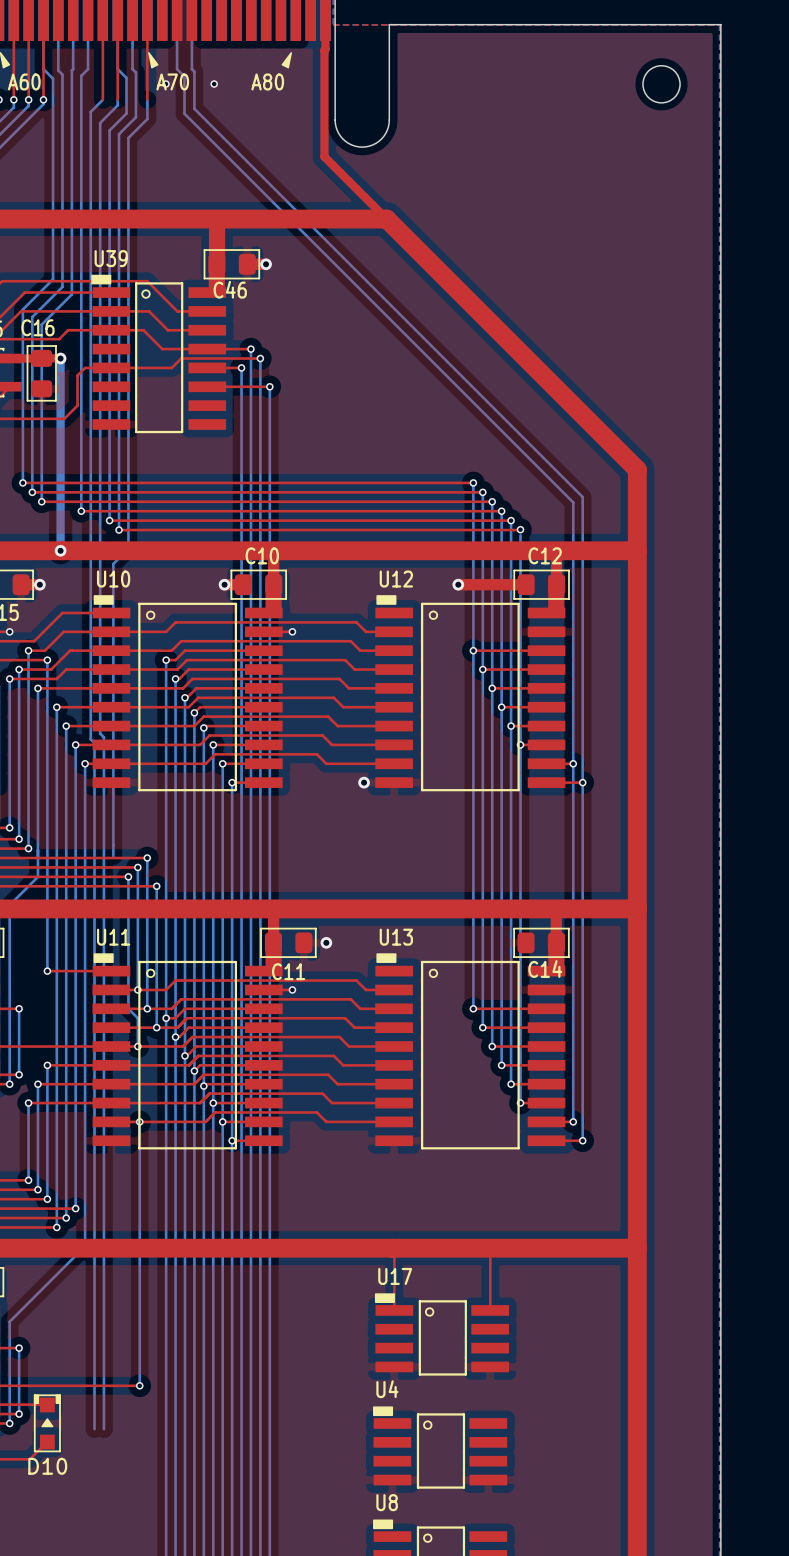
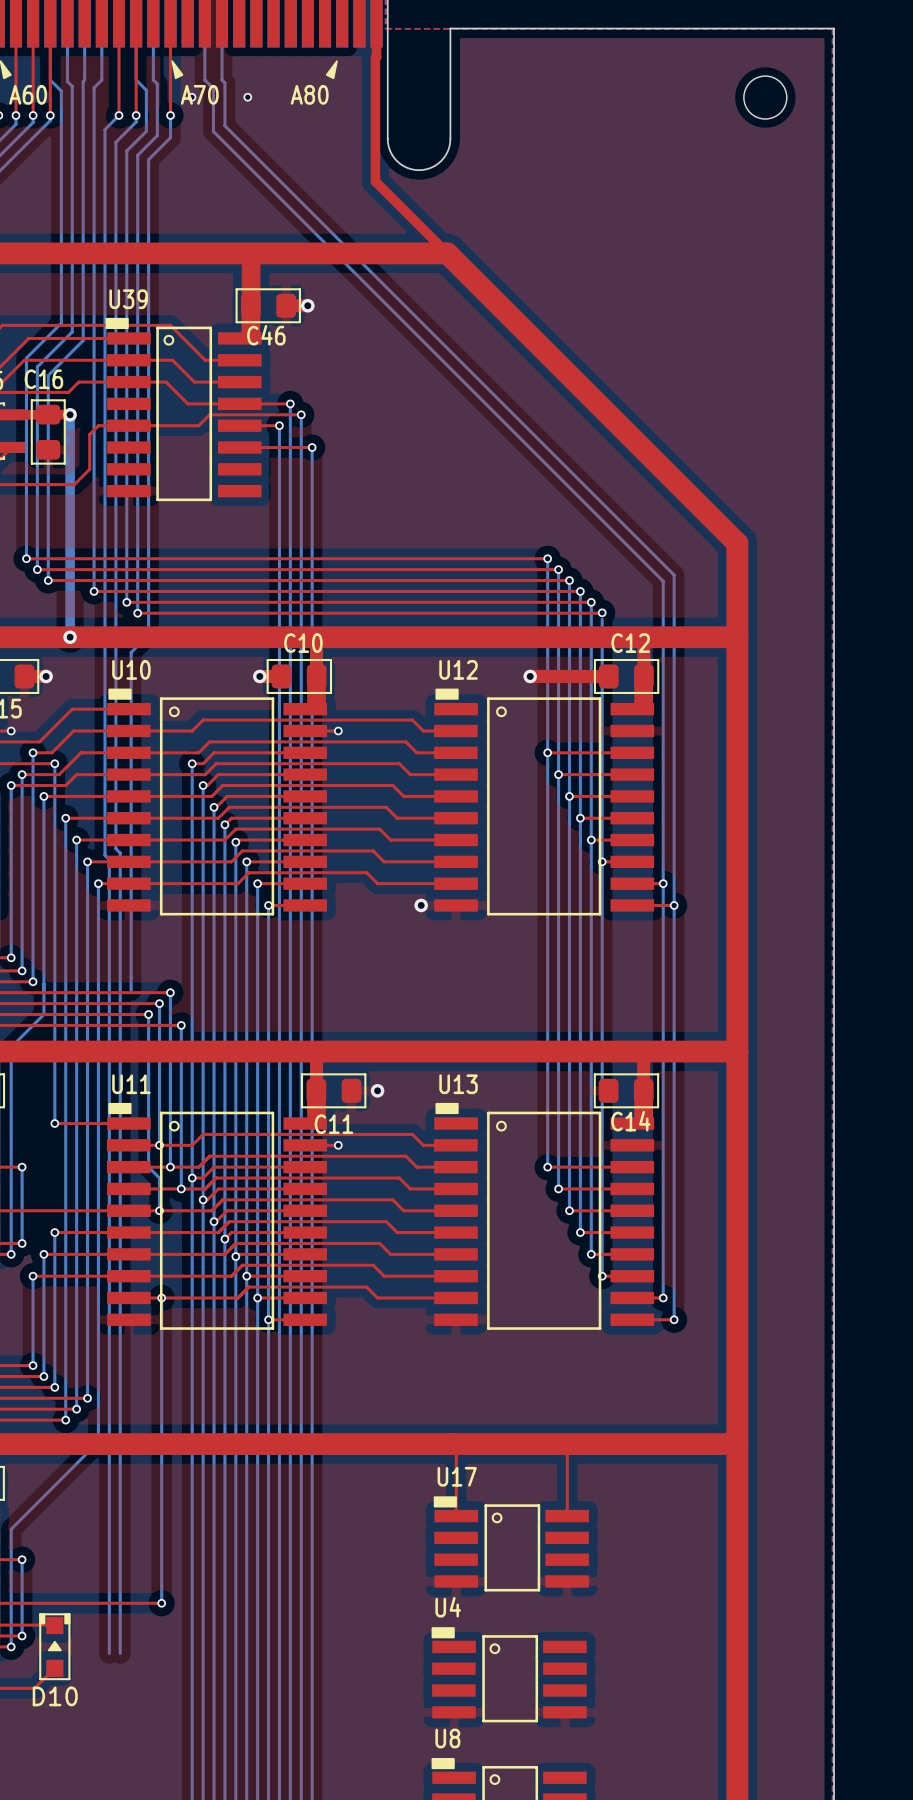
via: none -> (119, 115)
via: none -> (136, 115)
via: none -> (170, 115)

